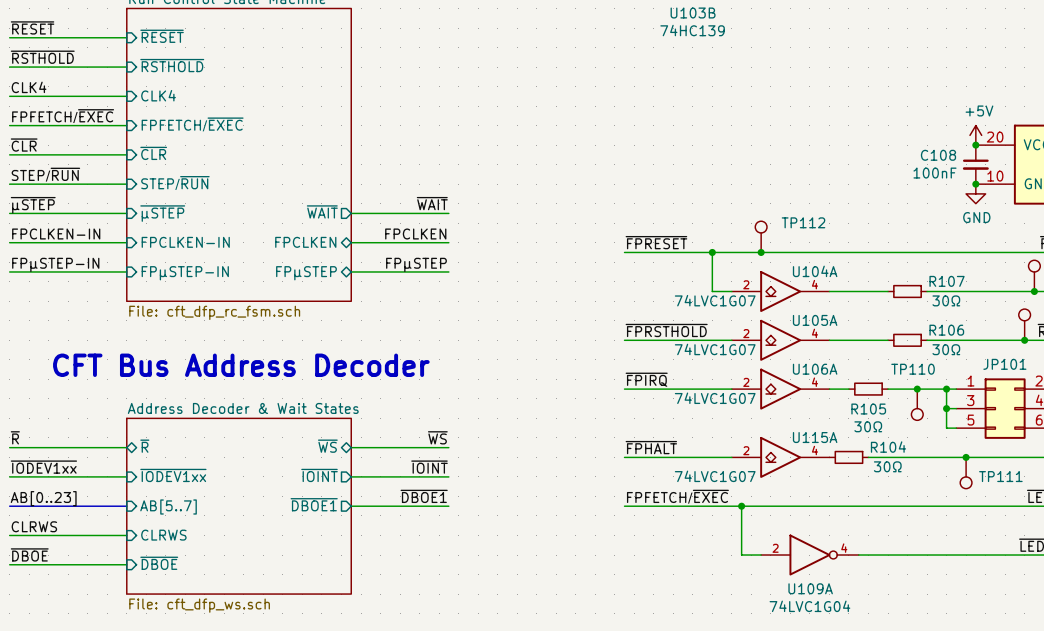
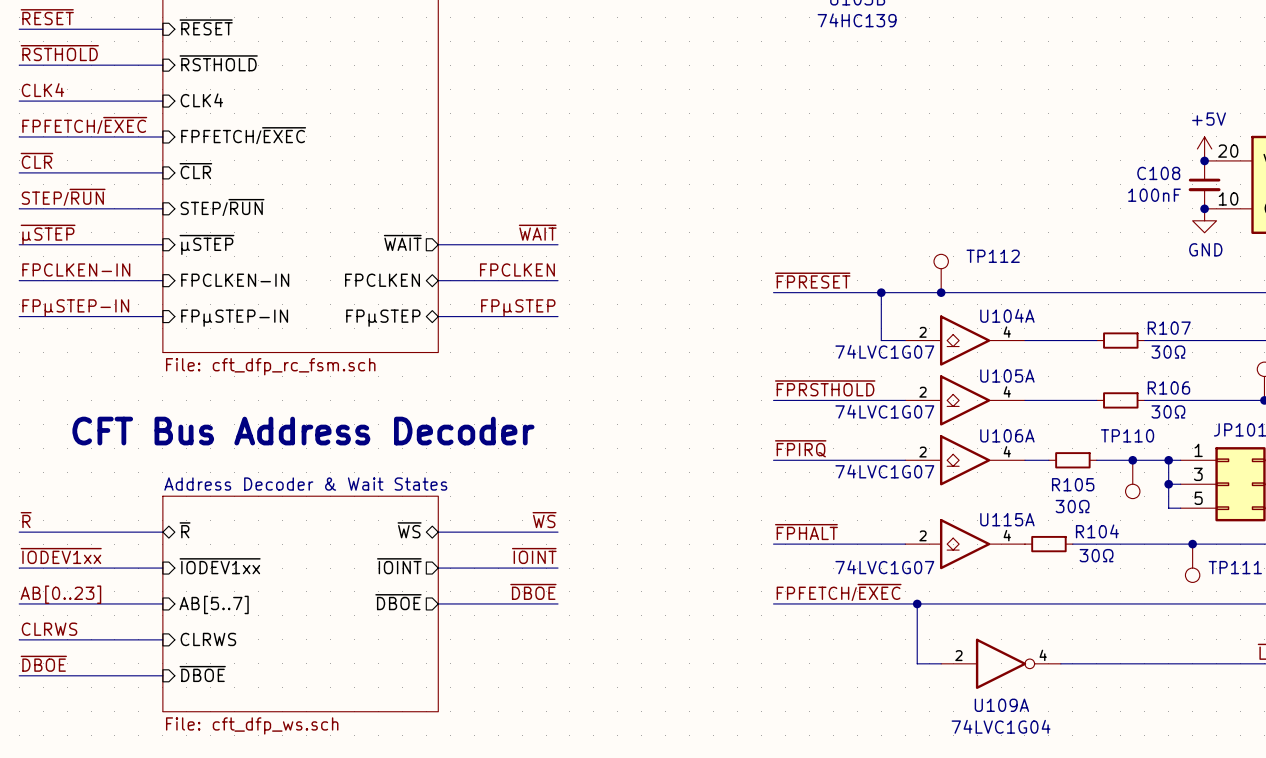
label: ~{DBOE1} (424, 496) -> ~{DBOE} (533, 591)
sheet pin: ~{DBOE1} (314, 504) -> ~{DBOE} (398, 602)

